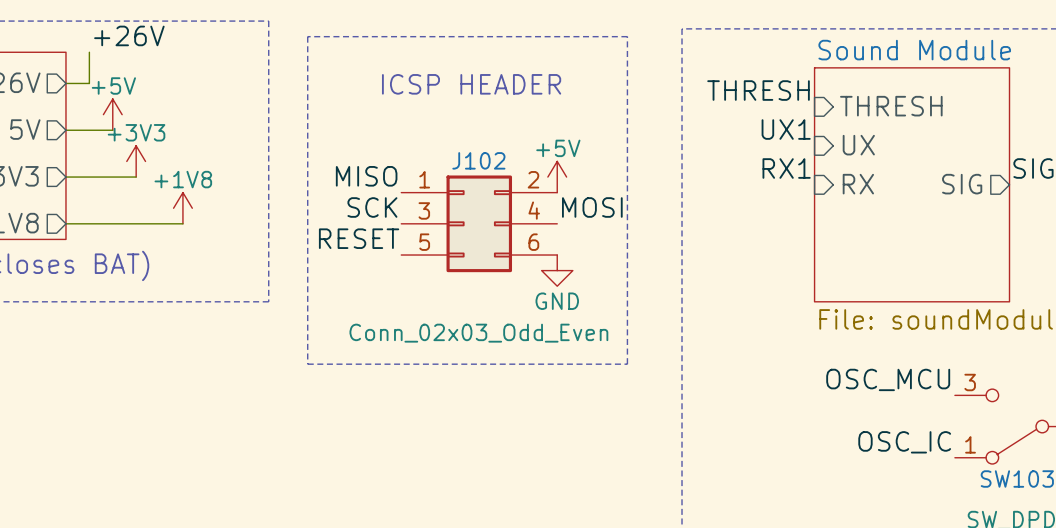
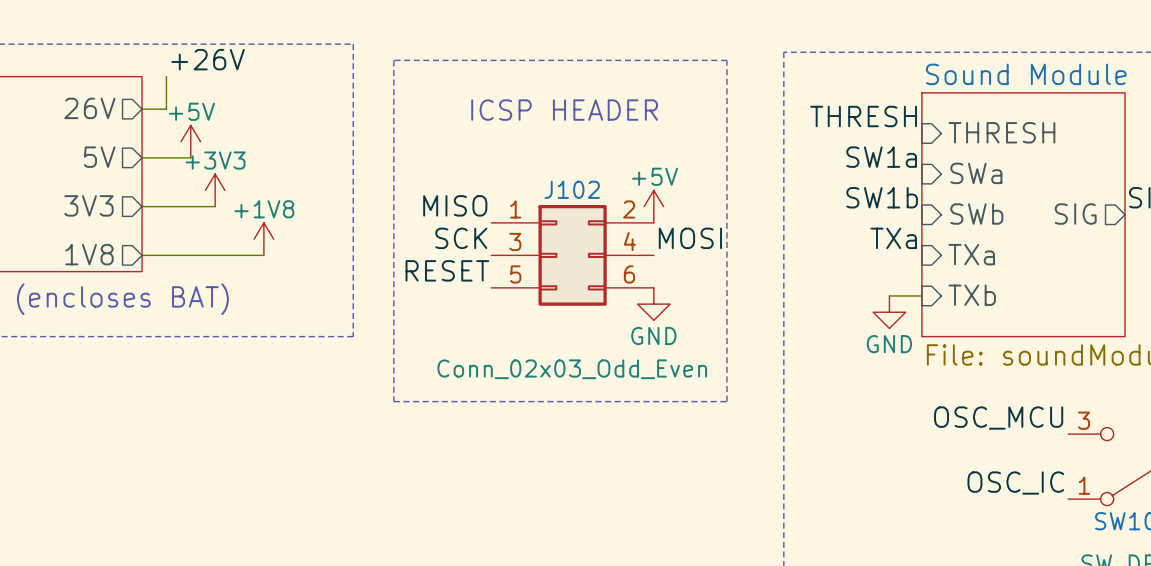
label: UX1 (786, 129) -> SW1a (881, 157)
sheet pin: UX (858, 145) -> SWa (976, 173)
label: RX1 (786, 168) -> SW1b (882, 197)
sheet pin: RX (858, 184) -> SWb (976, 214)
label: none -> TXa (893, 238)
sheet pin: none -> TXa (971, 254)
wire: none -> (889, 295) (921, 295)
sheet pin: none -> TXb (972, 295)
power symbol: none -> GND (889, 312)

